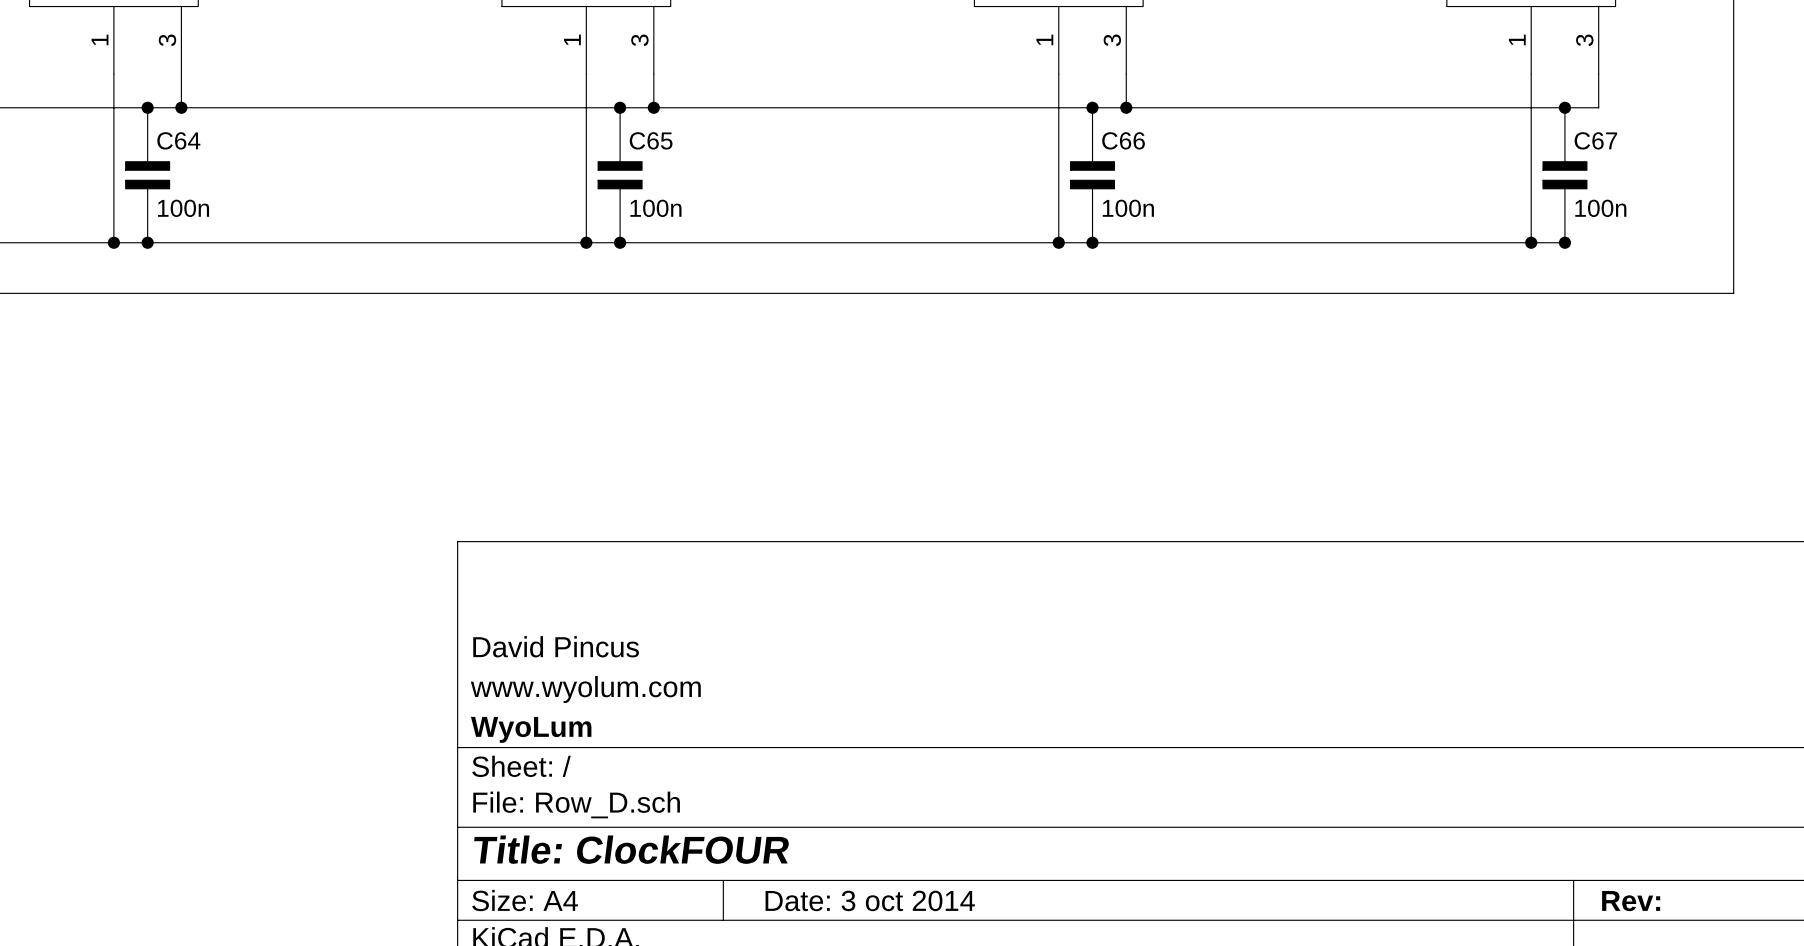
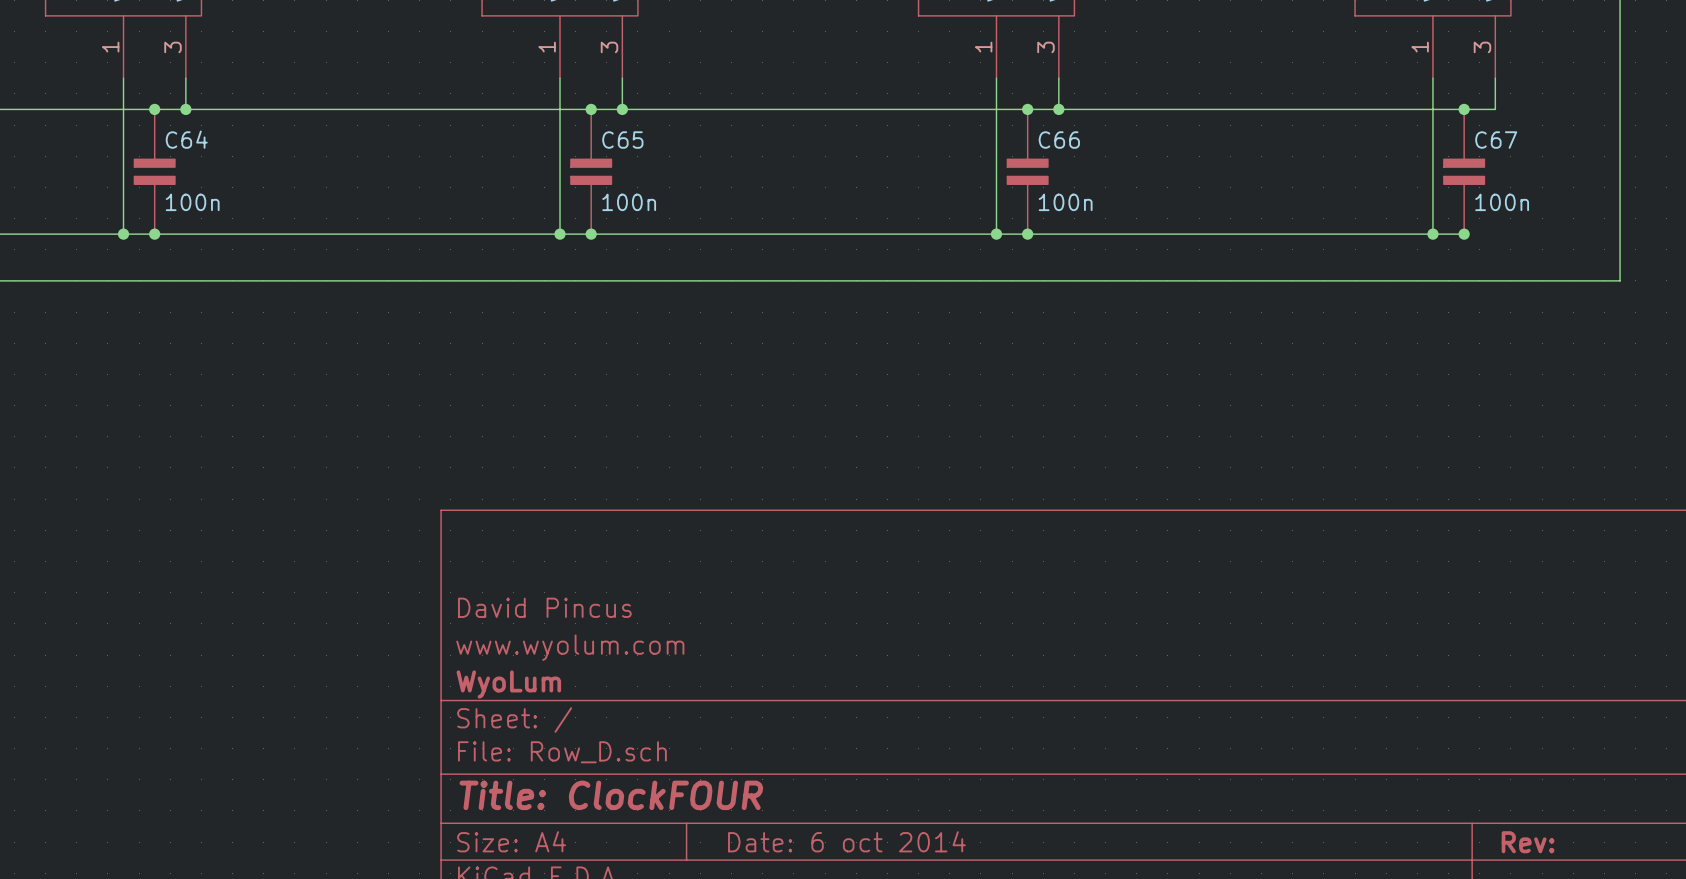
title block: Date: 3 oct 2014 (870, 900) -> Date: 6 oct 2014 (846, 841)

